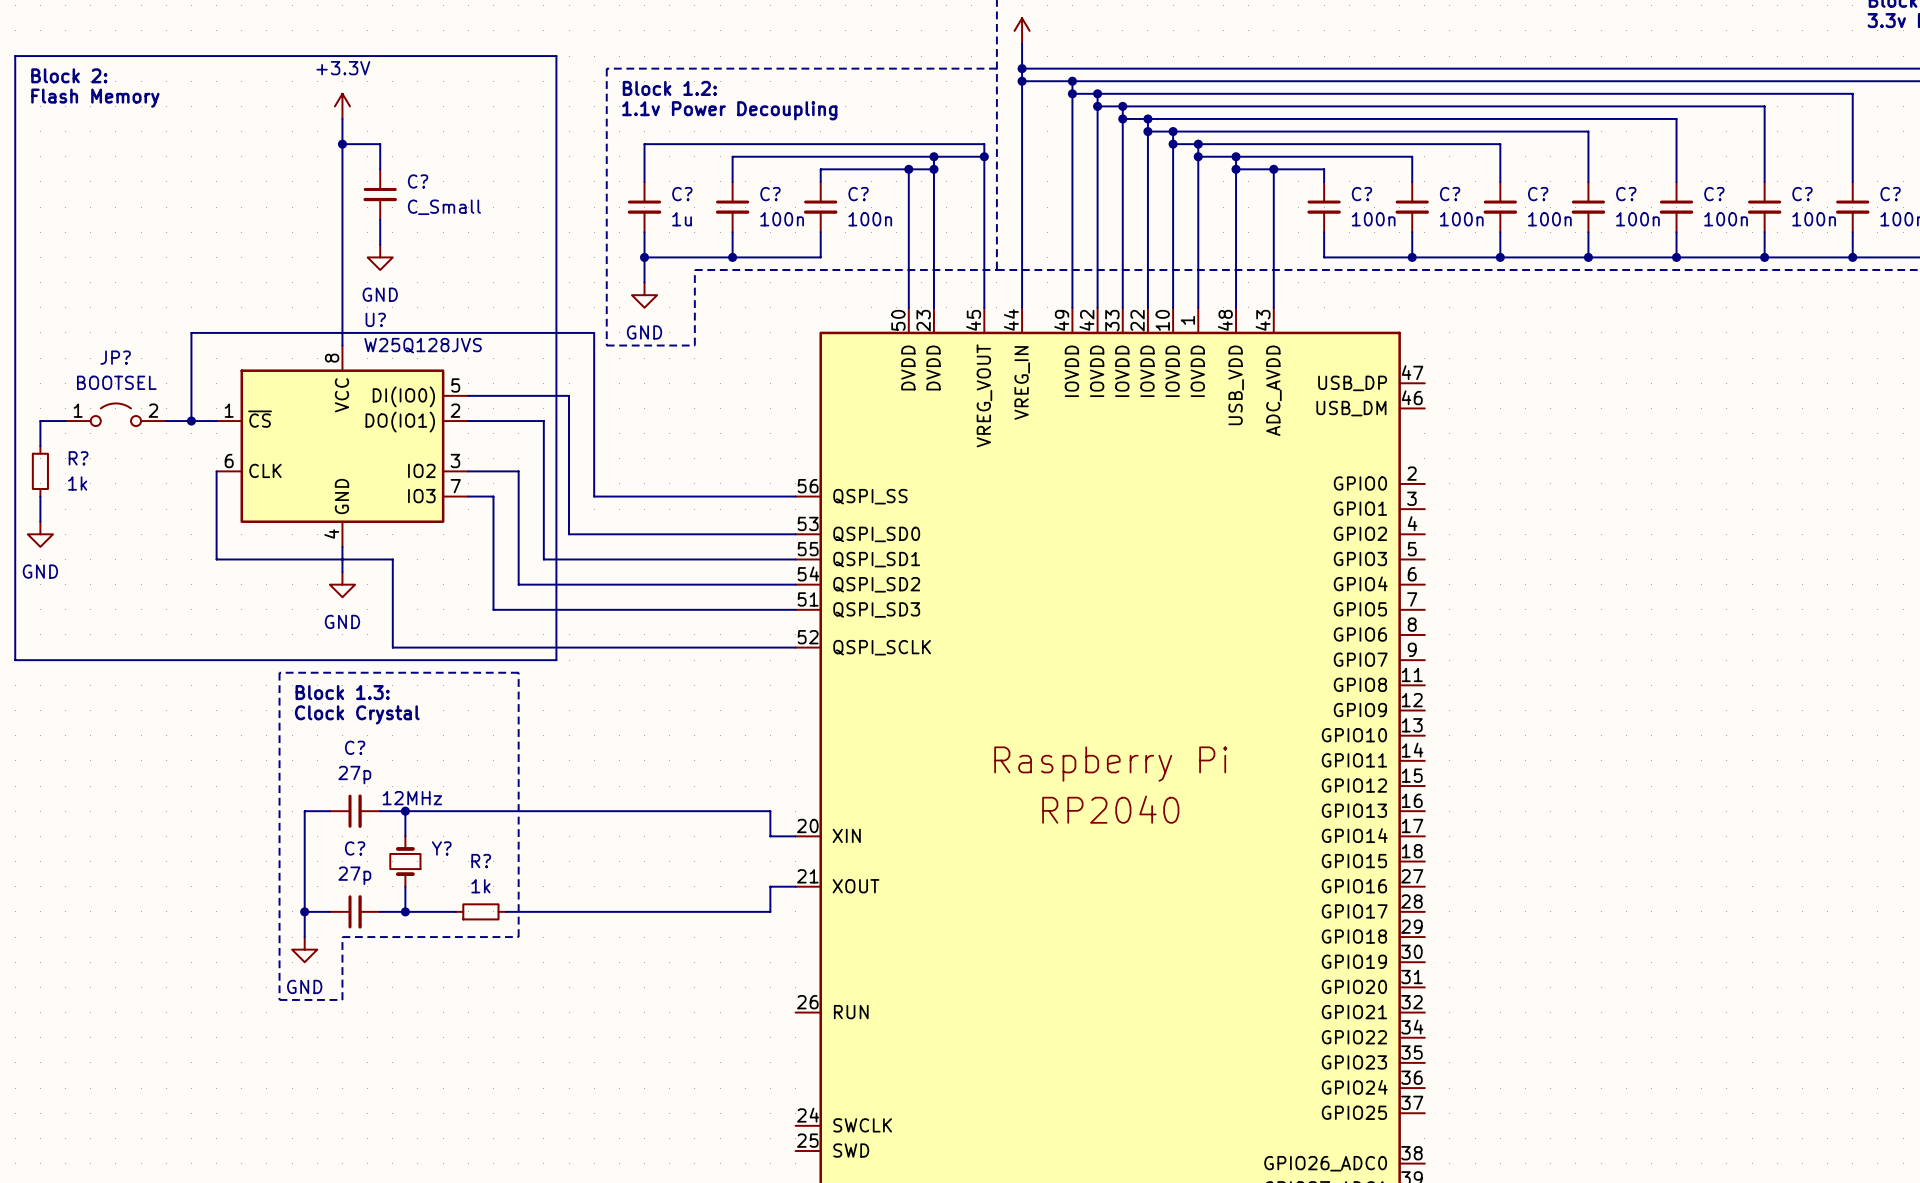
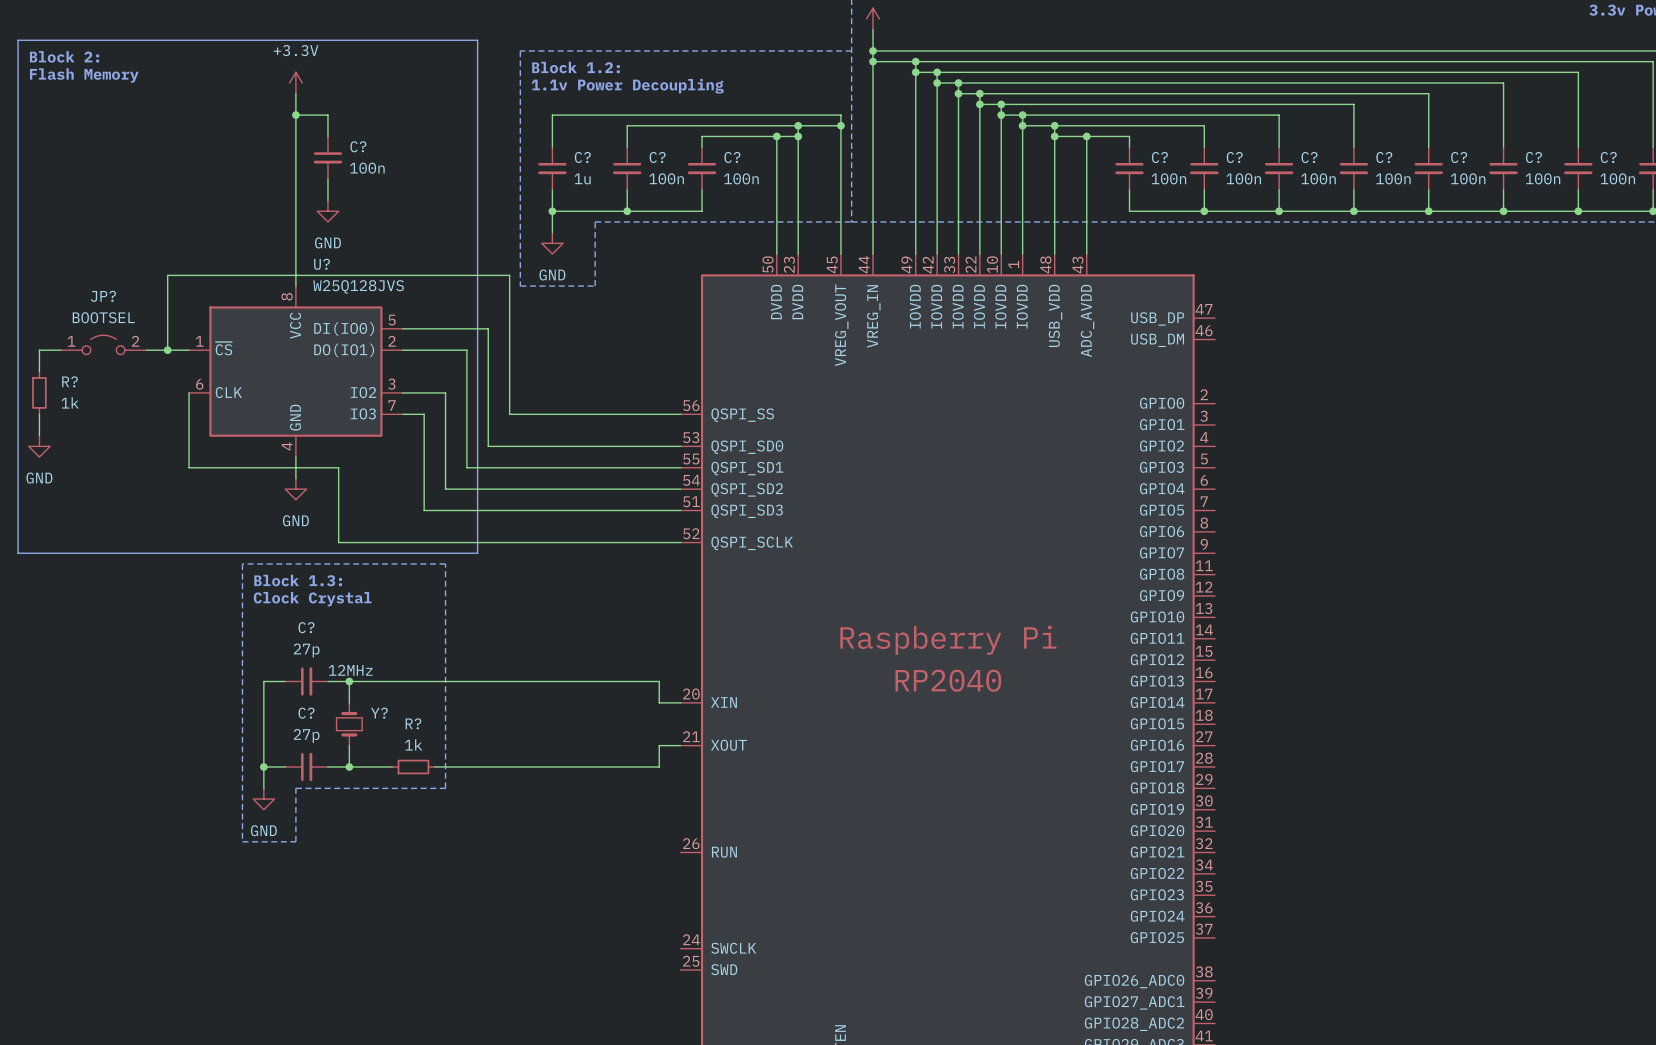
C? value: C_Small (444, 207) -> 100n (367, 168)

